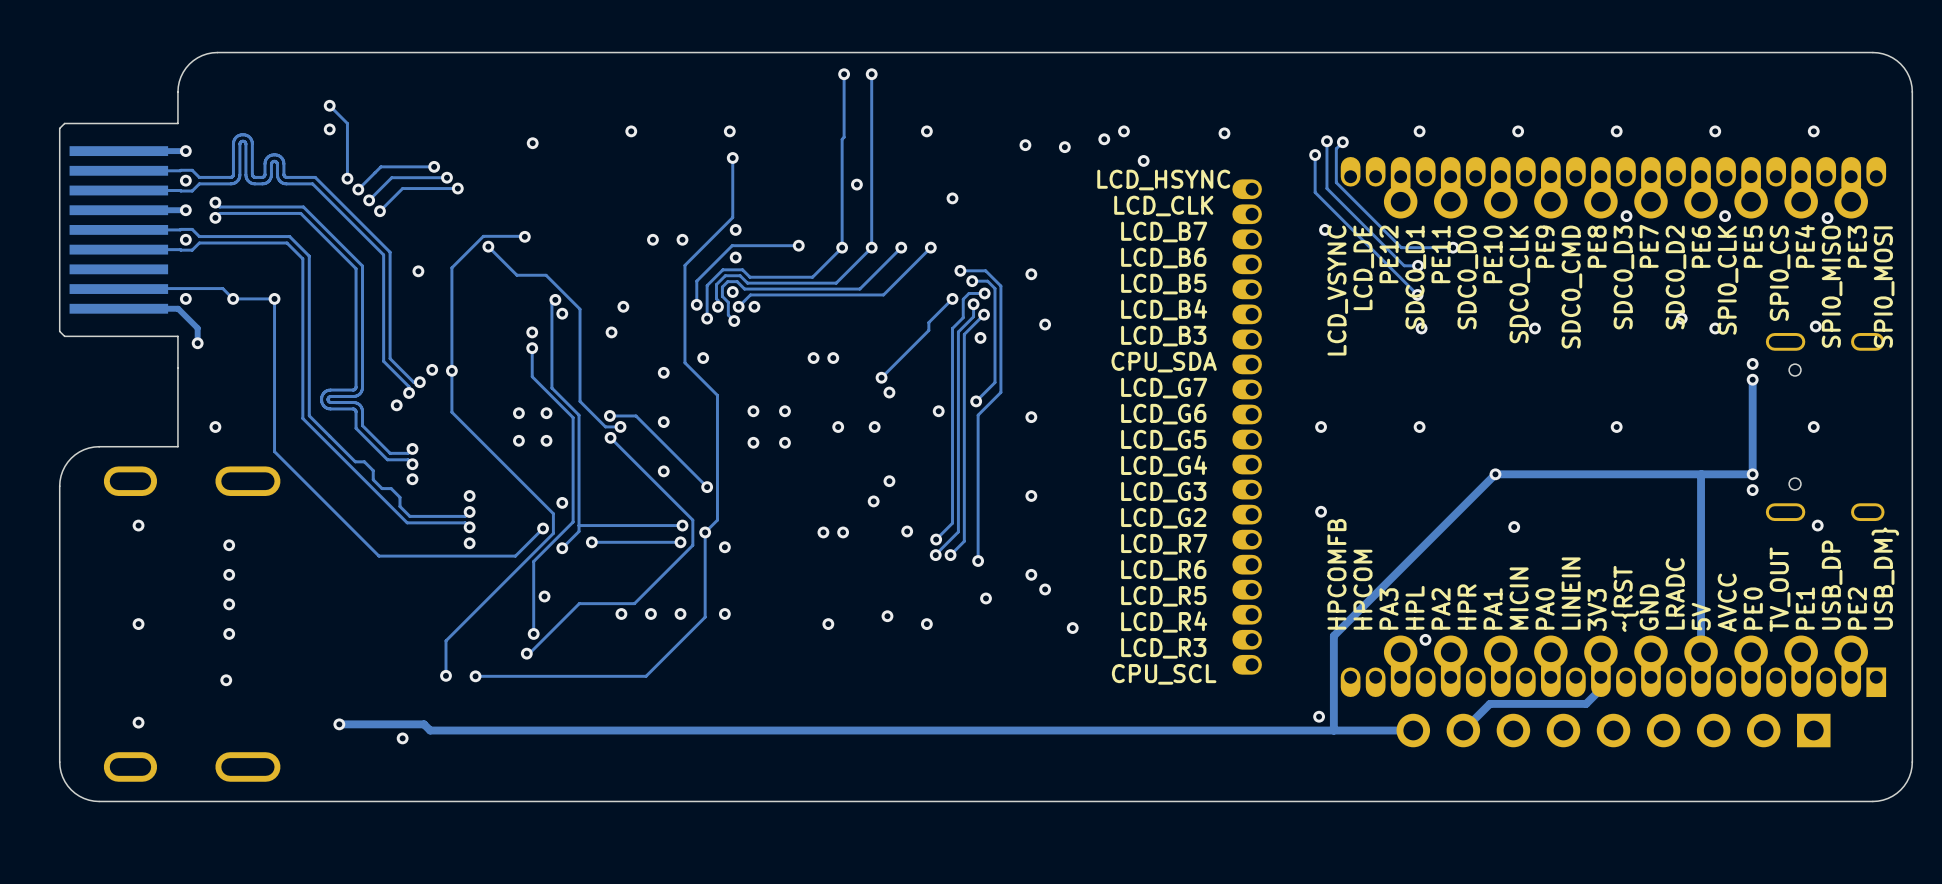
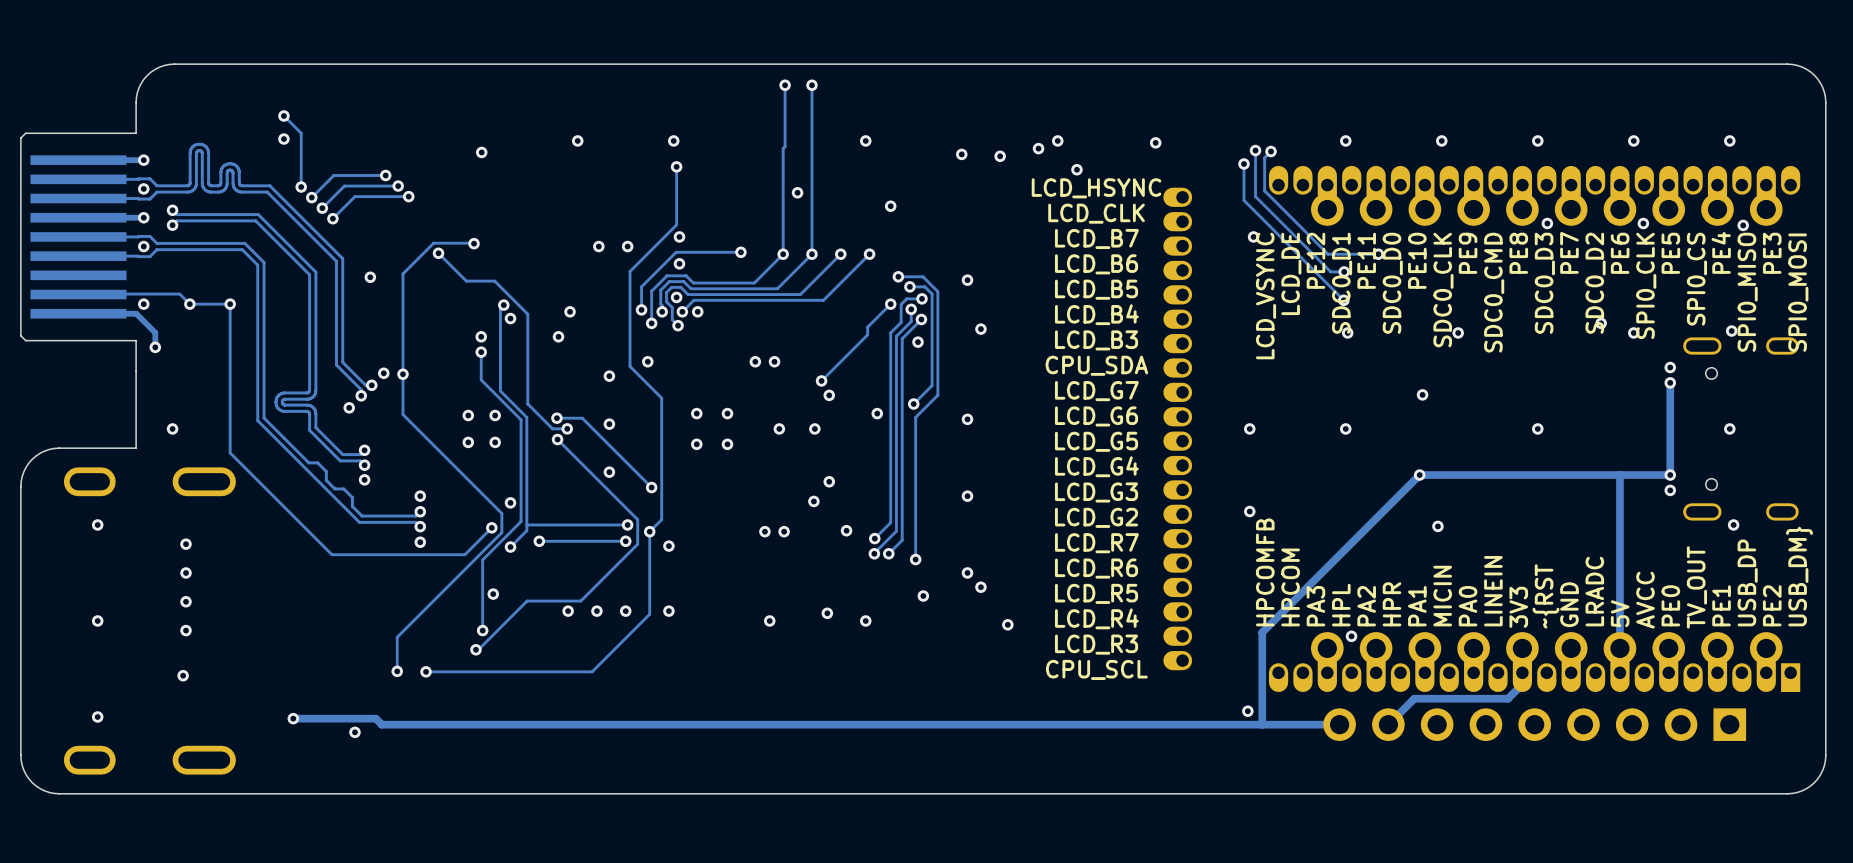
via: none -> (1422, 394)

